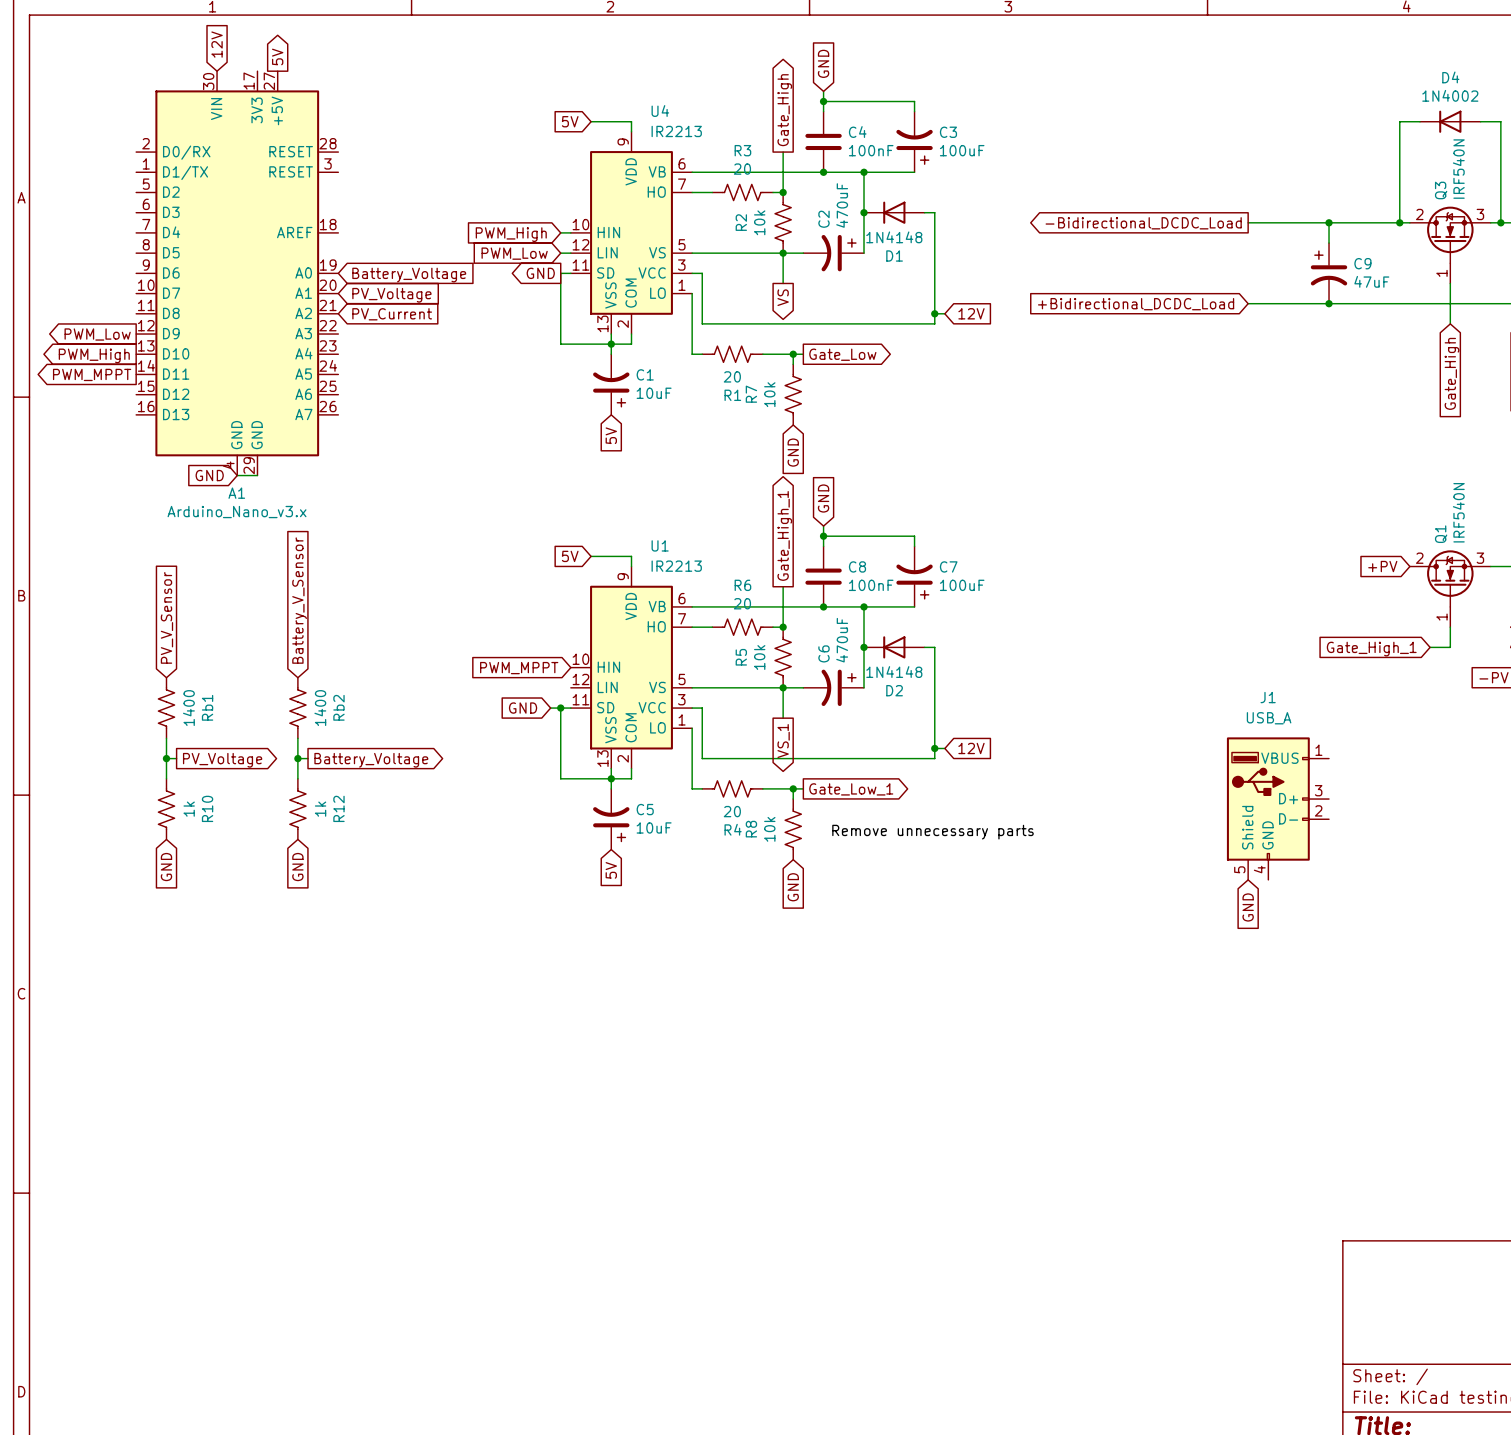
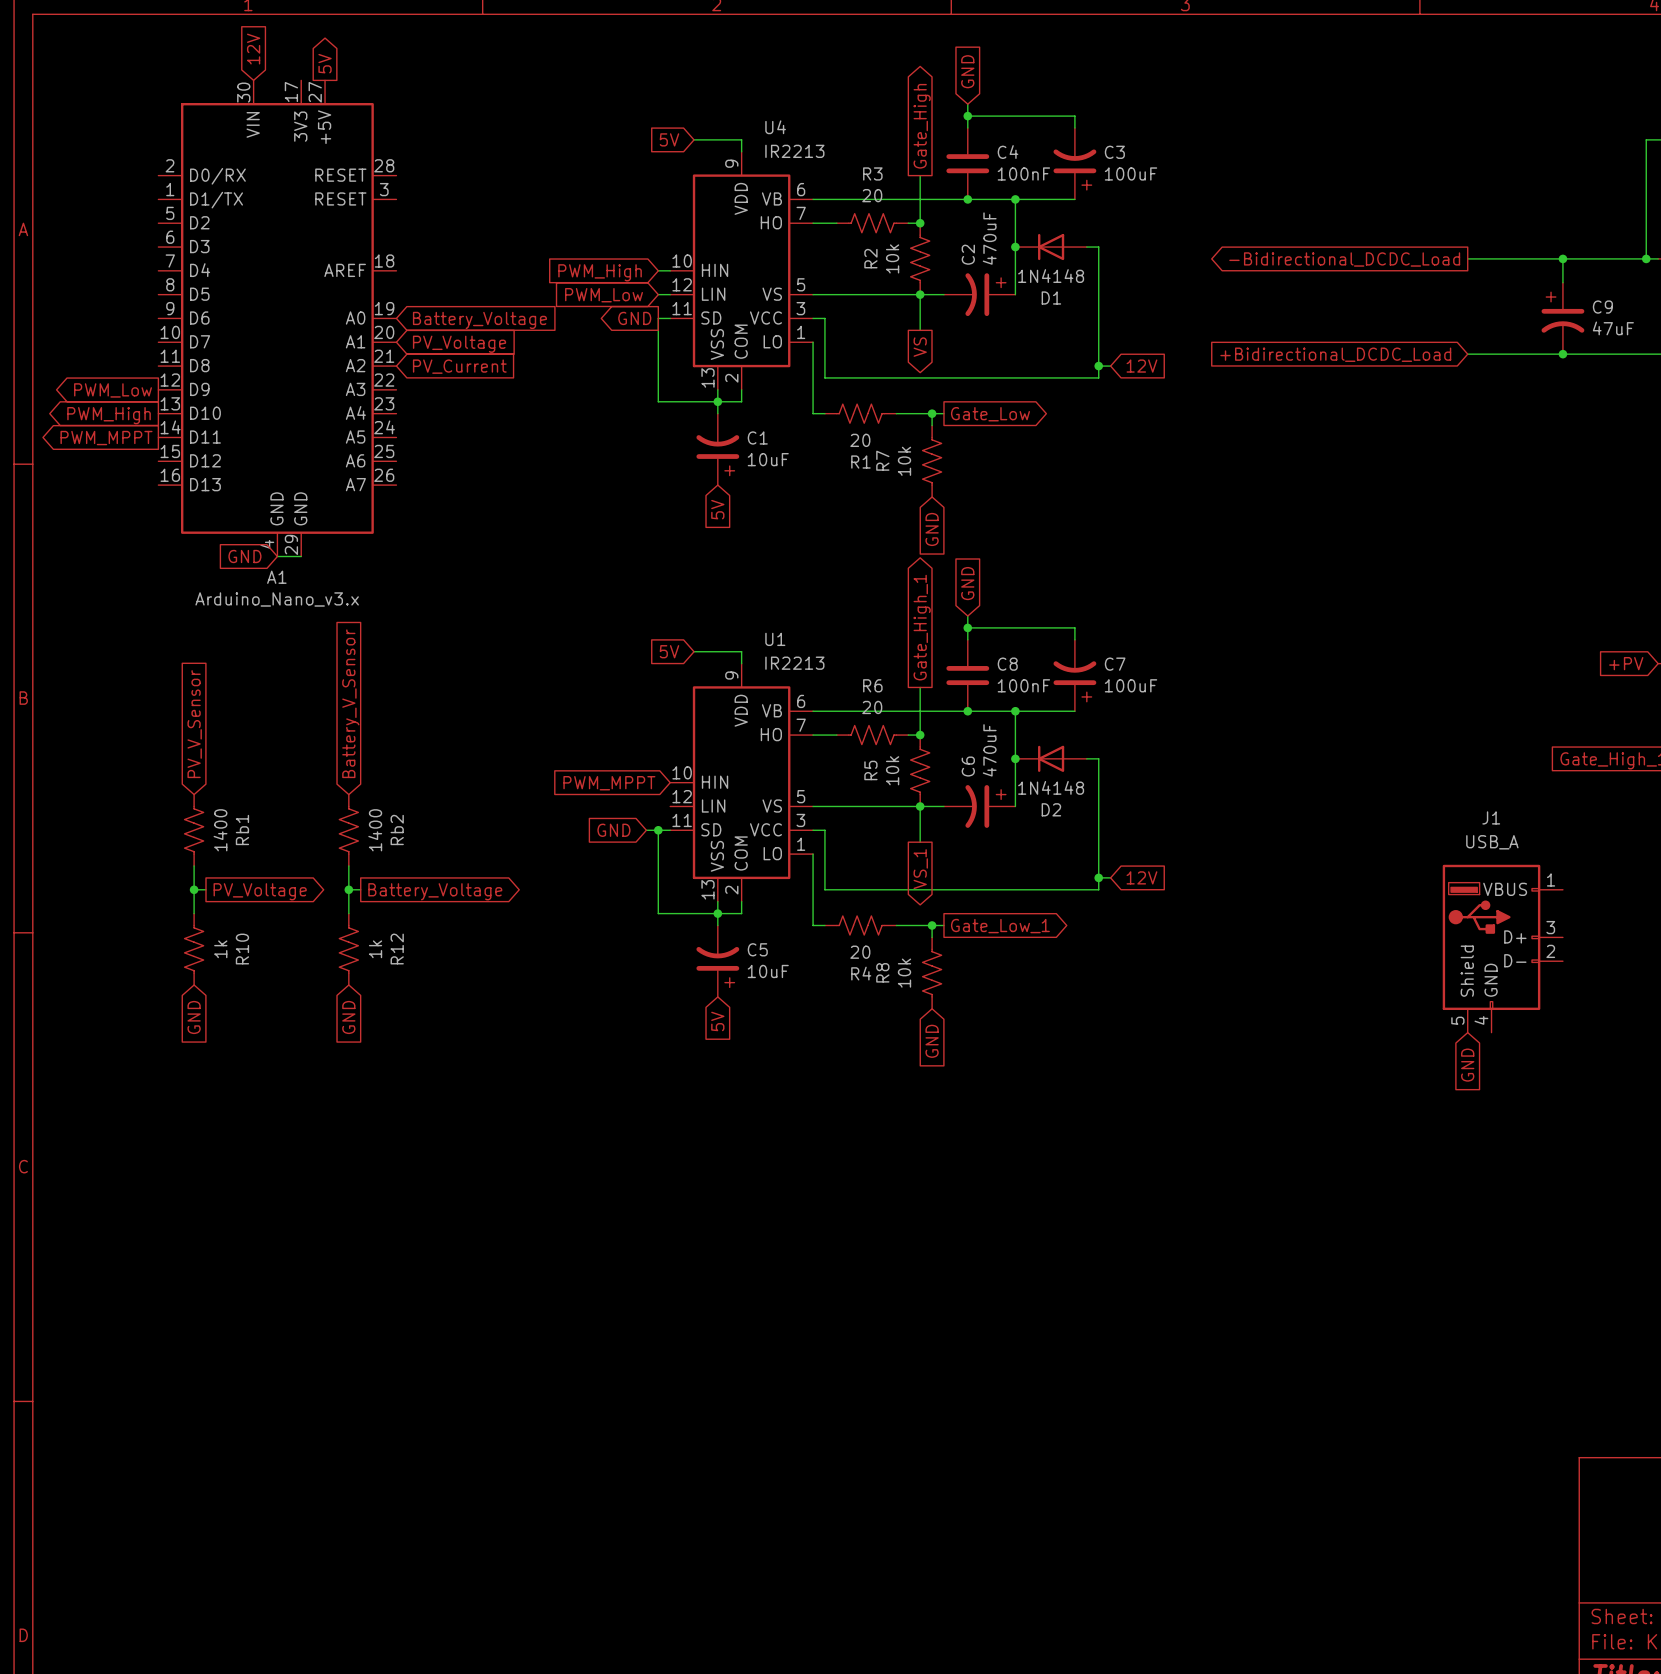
label: Remove unnecessary parts (933, 832) -> none

